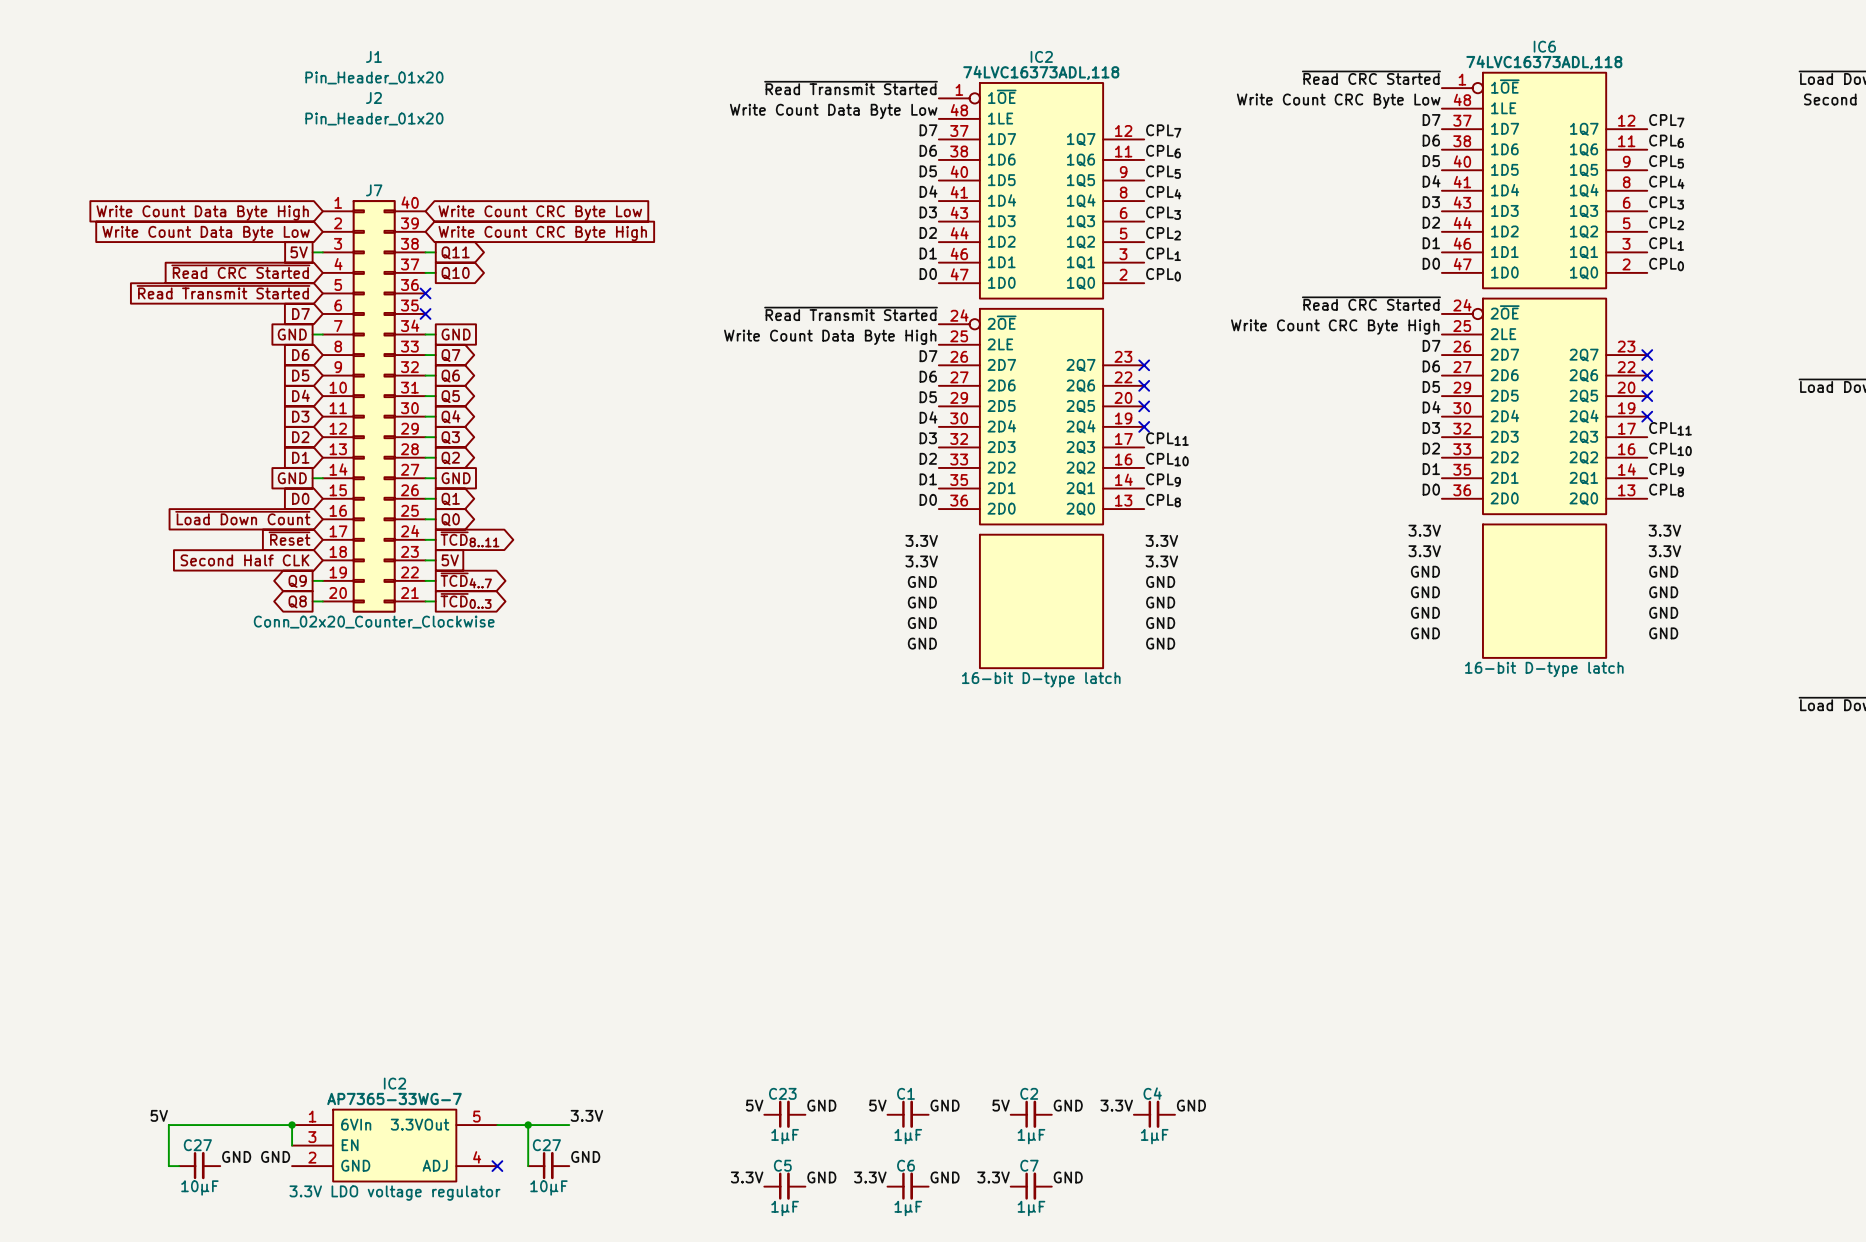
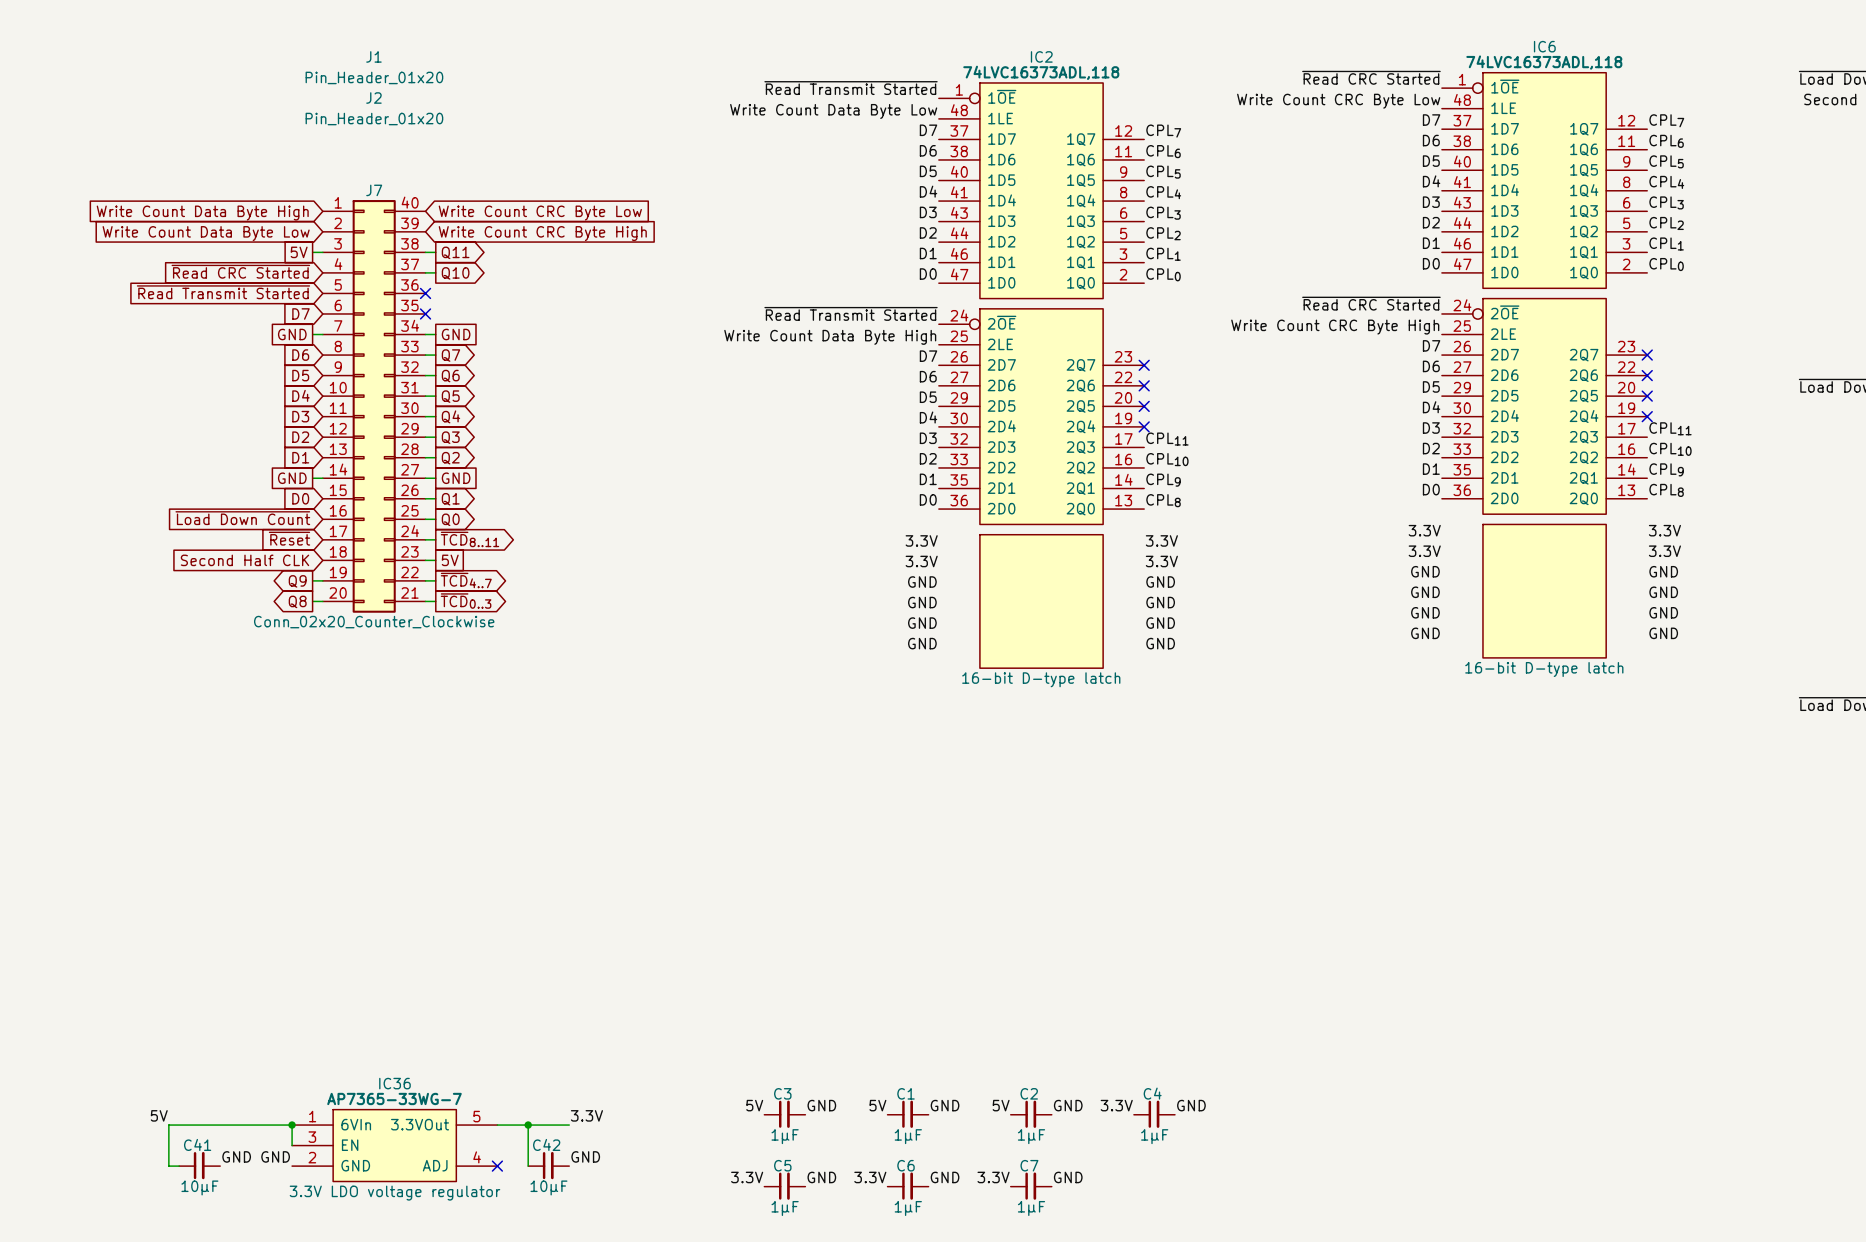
IC2 name: IC2 (394, 1083) -> IC36 (394, 1083)
C23 name: C23 (782, 1093) -> C3 (782, 1093)
C27 name: C27 (197, 1145) -> C41 (197, 1144)
C27 name: C27 (546, 1145) -> C42 (546, 1144)

